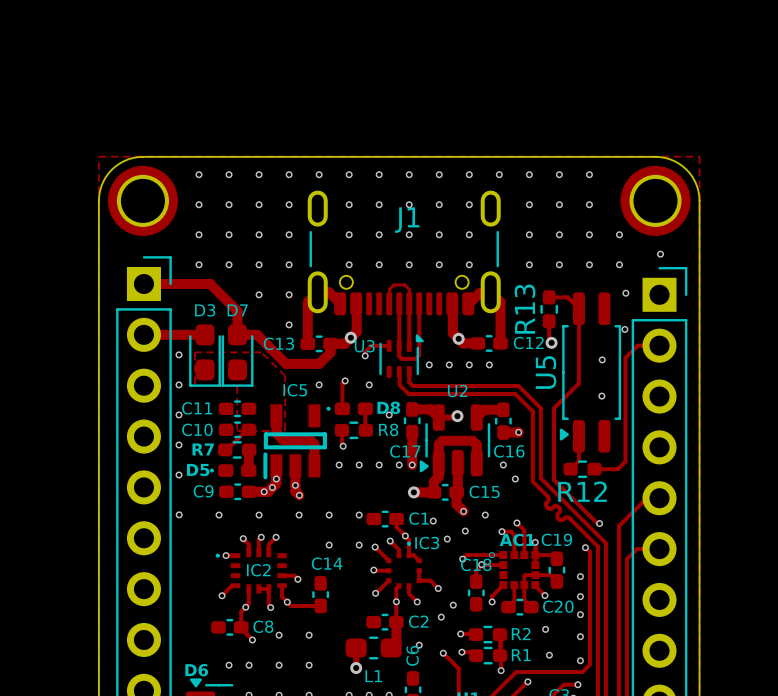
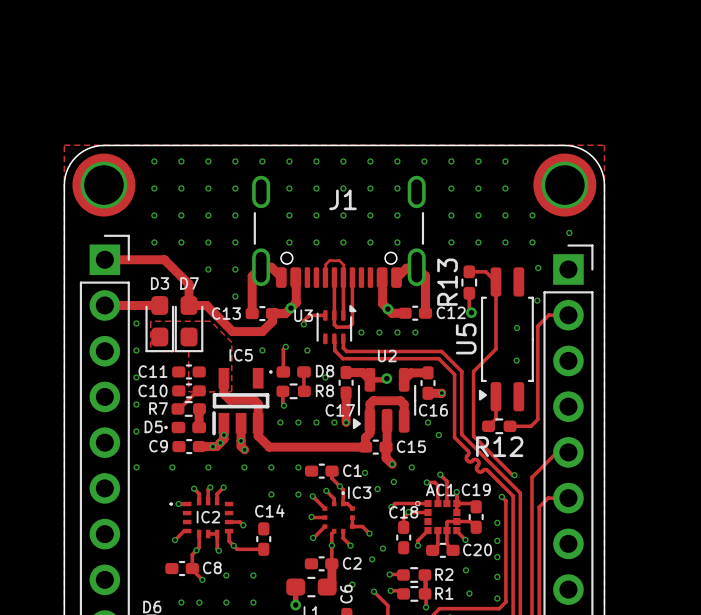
track: none -> (258, 423) (258, 435) (269, 447) (347, 447)
via: (413, 492) -> none

